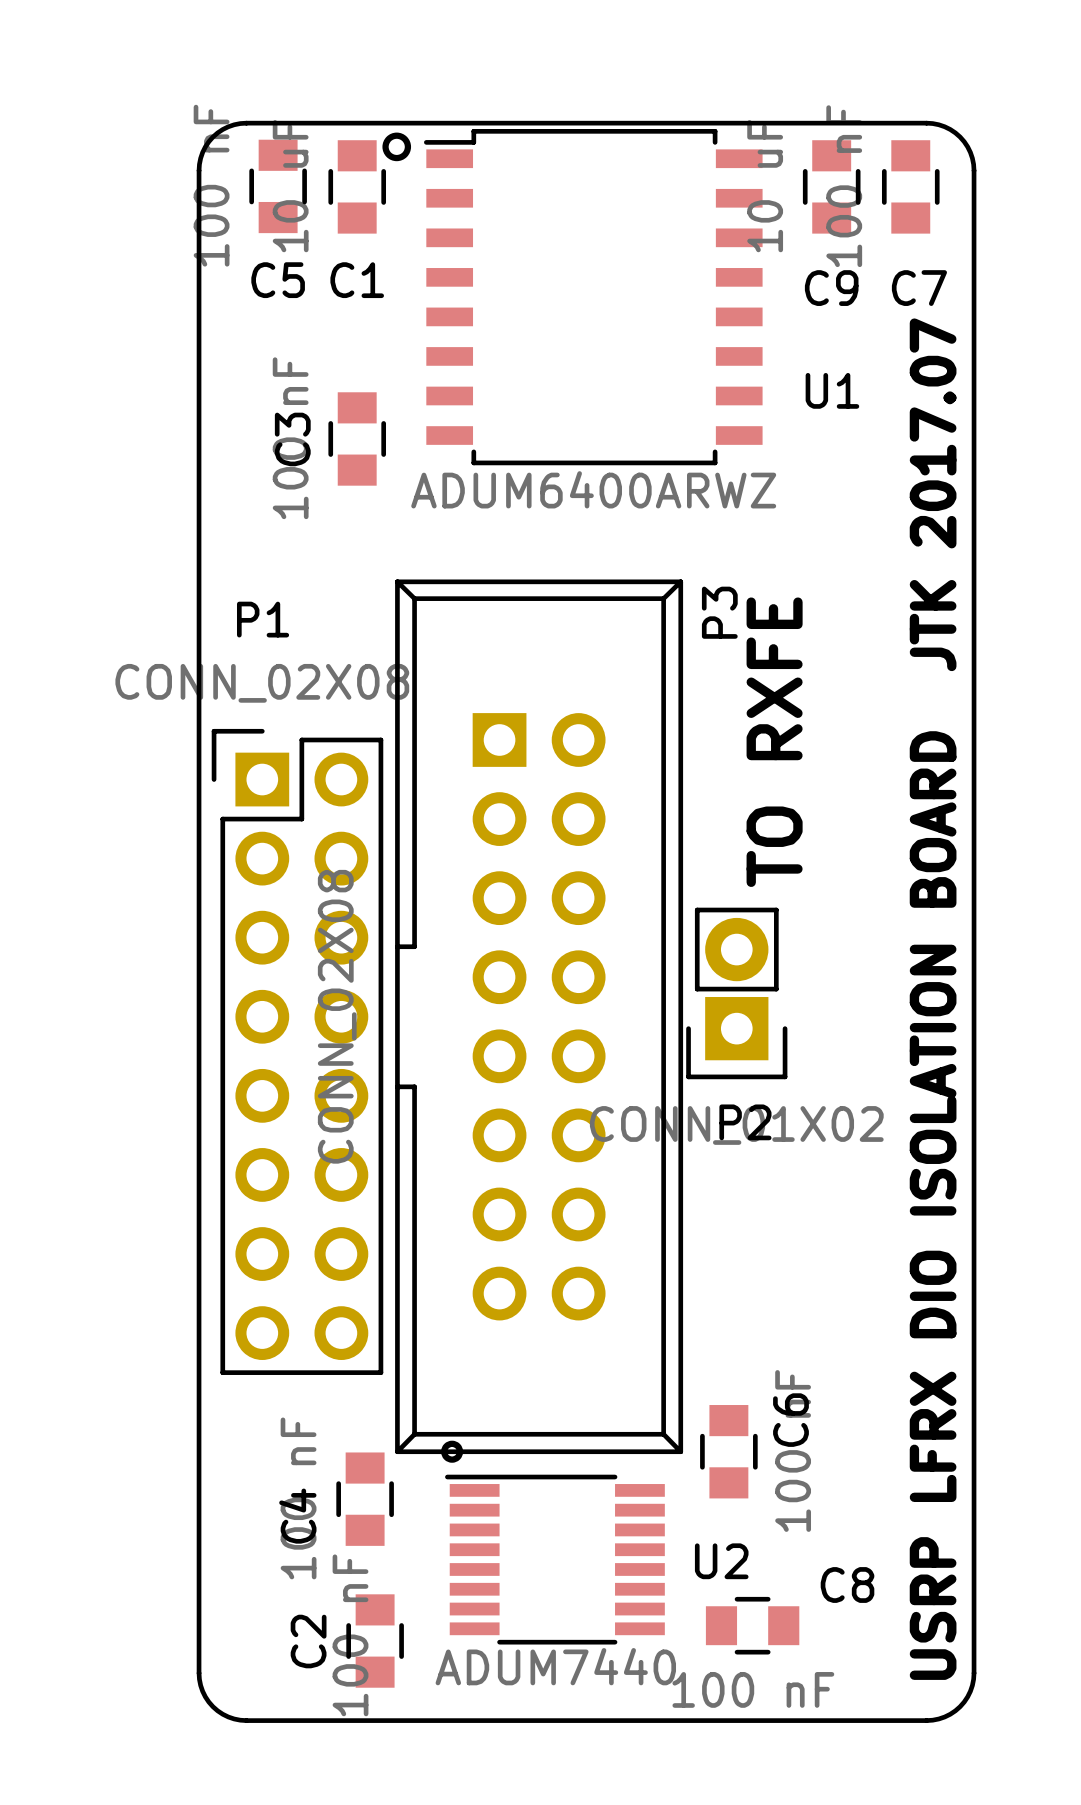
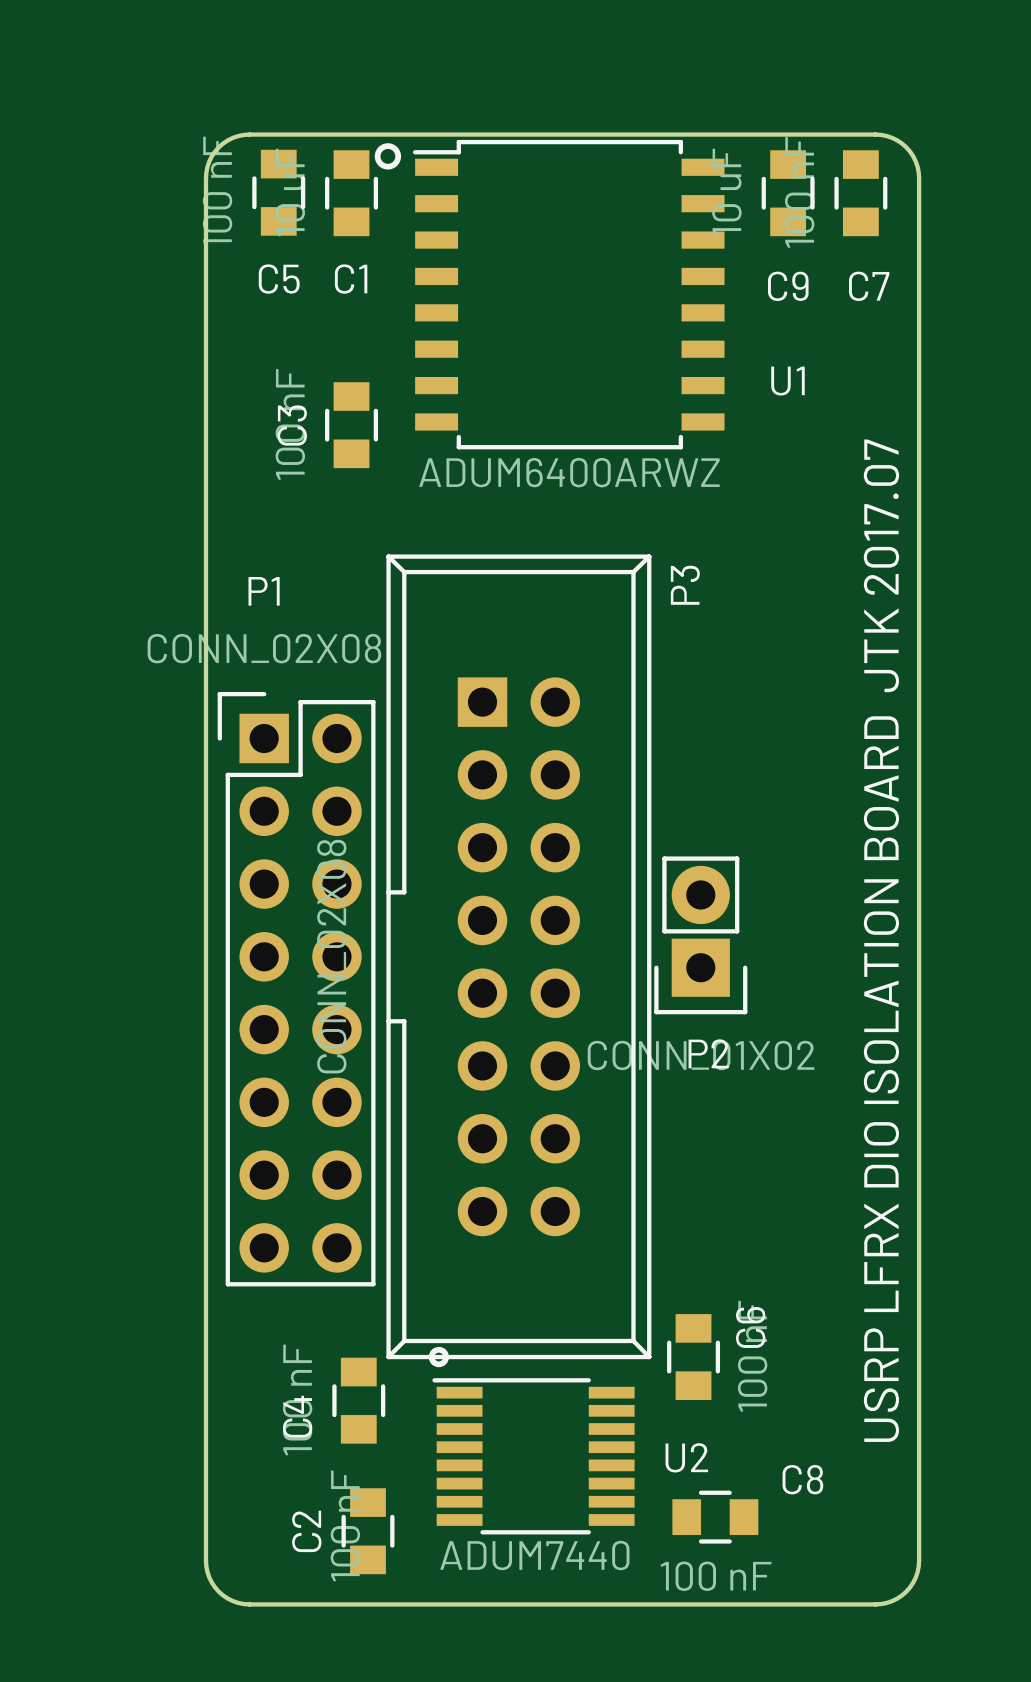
text: TO RXFE (774, 742) -> none

